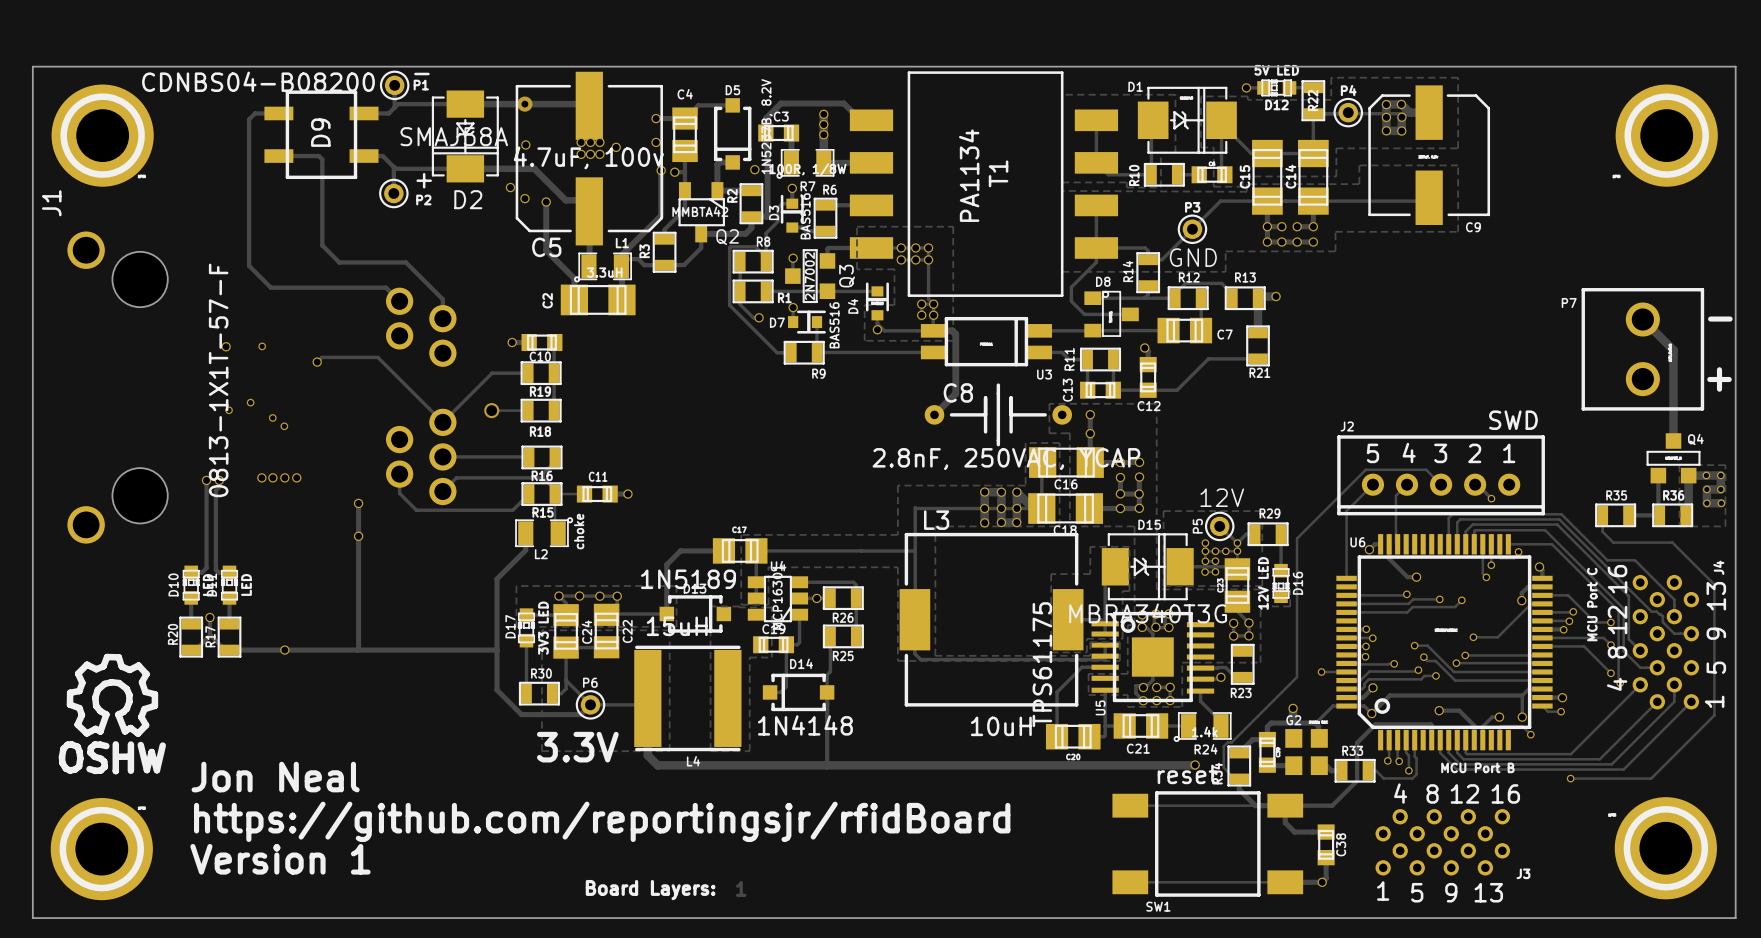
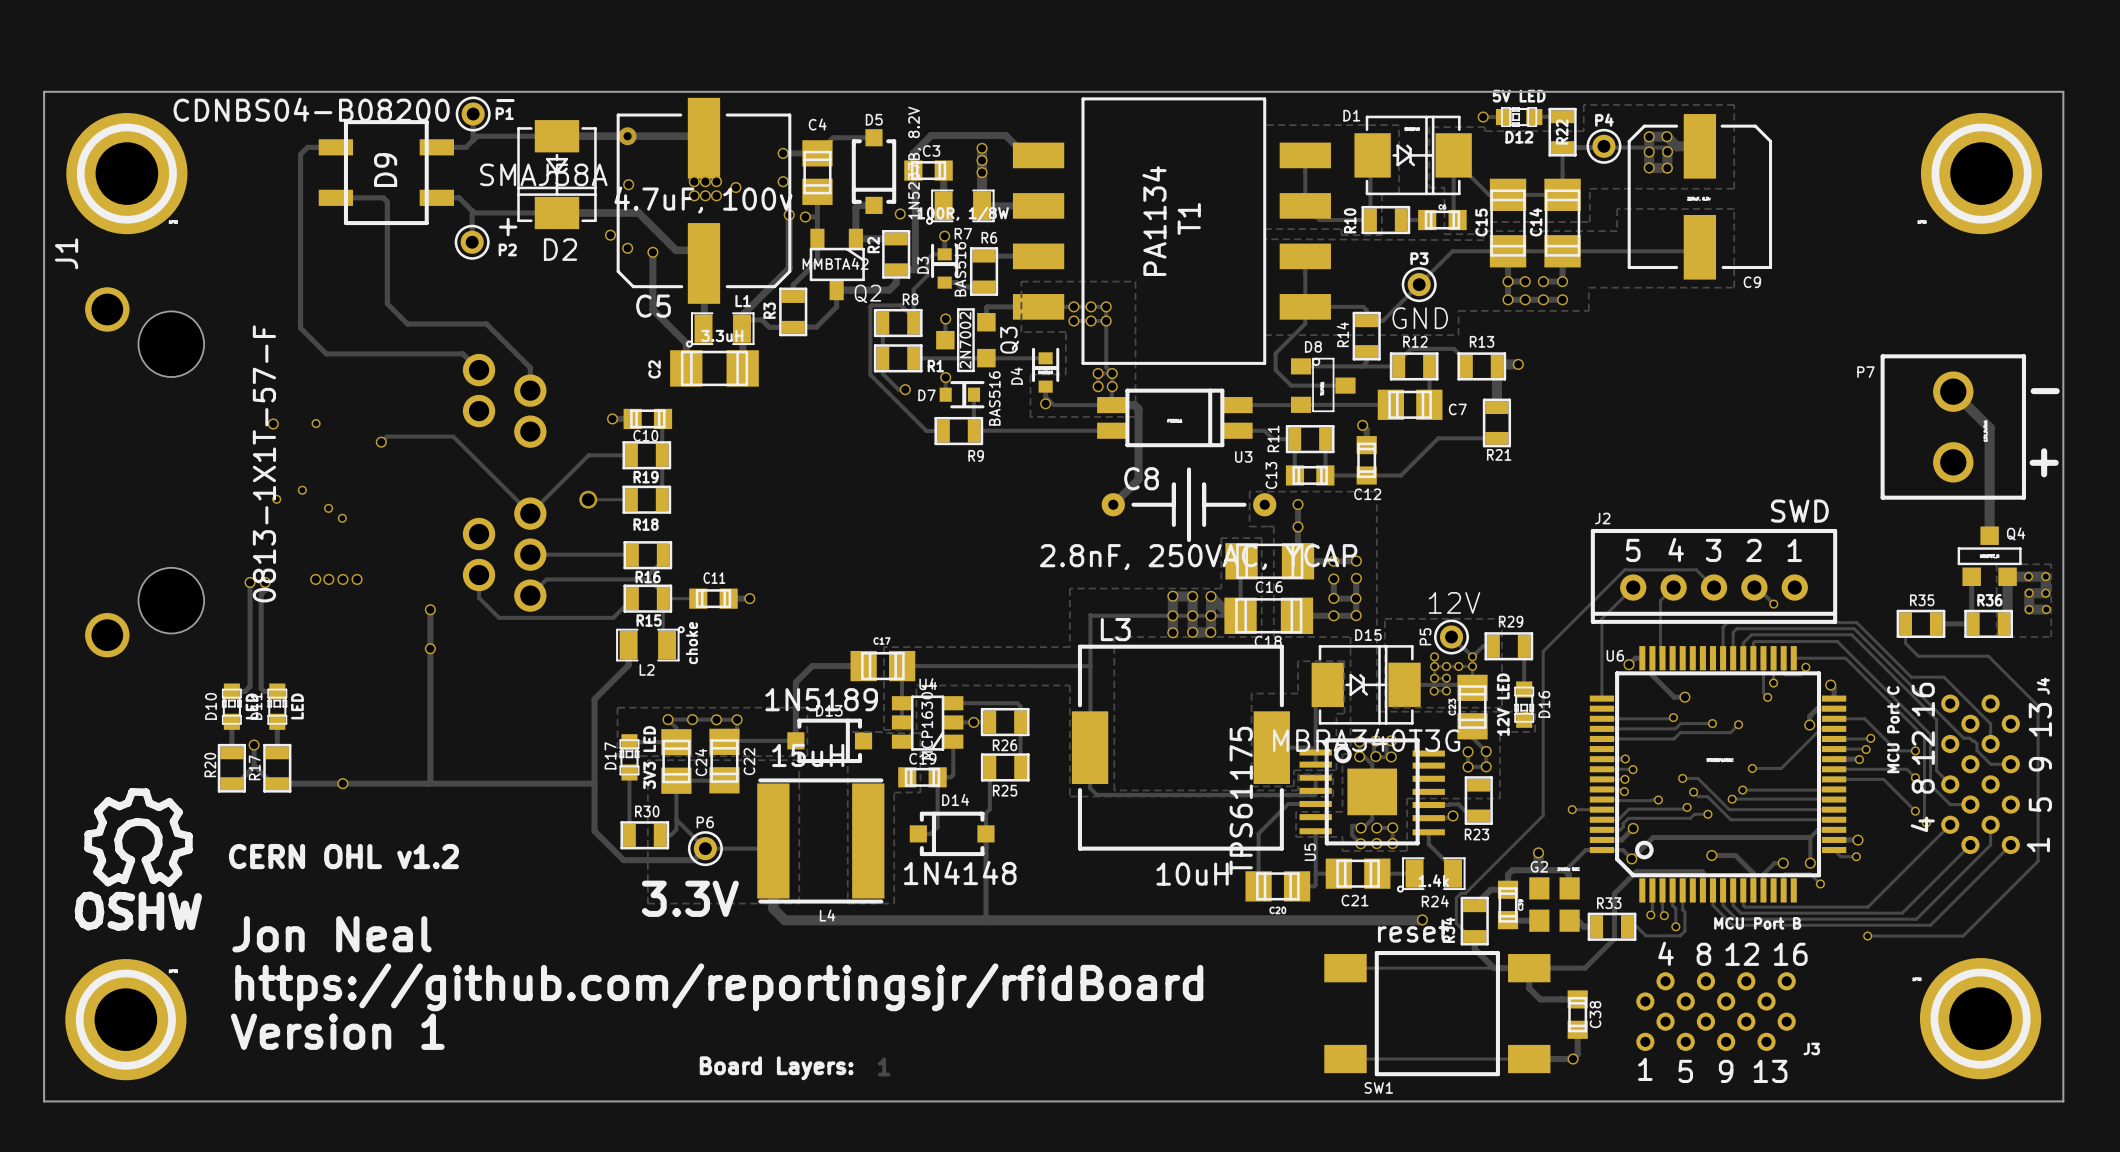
text: none -> CERN OHL v1.2 (343, 856)

